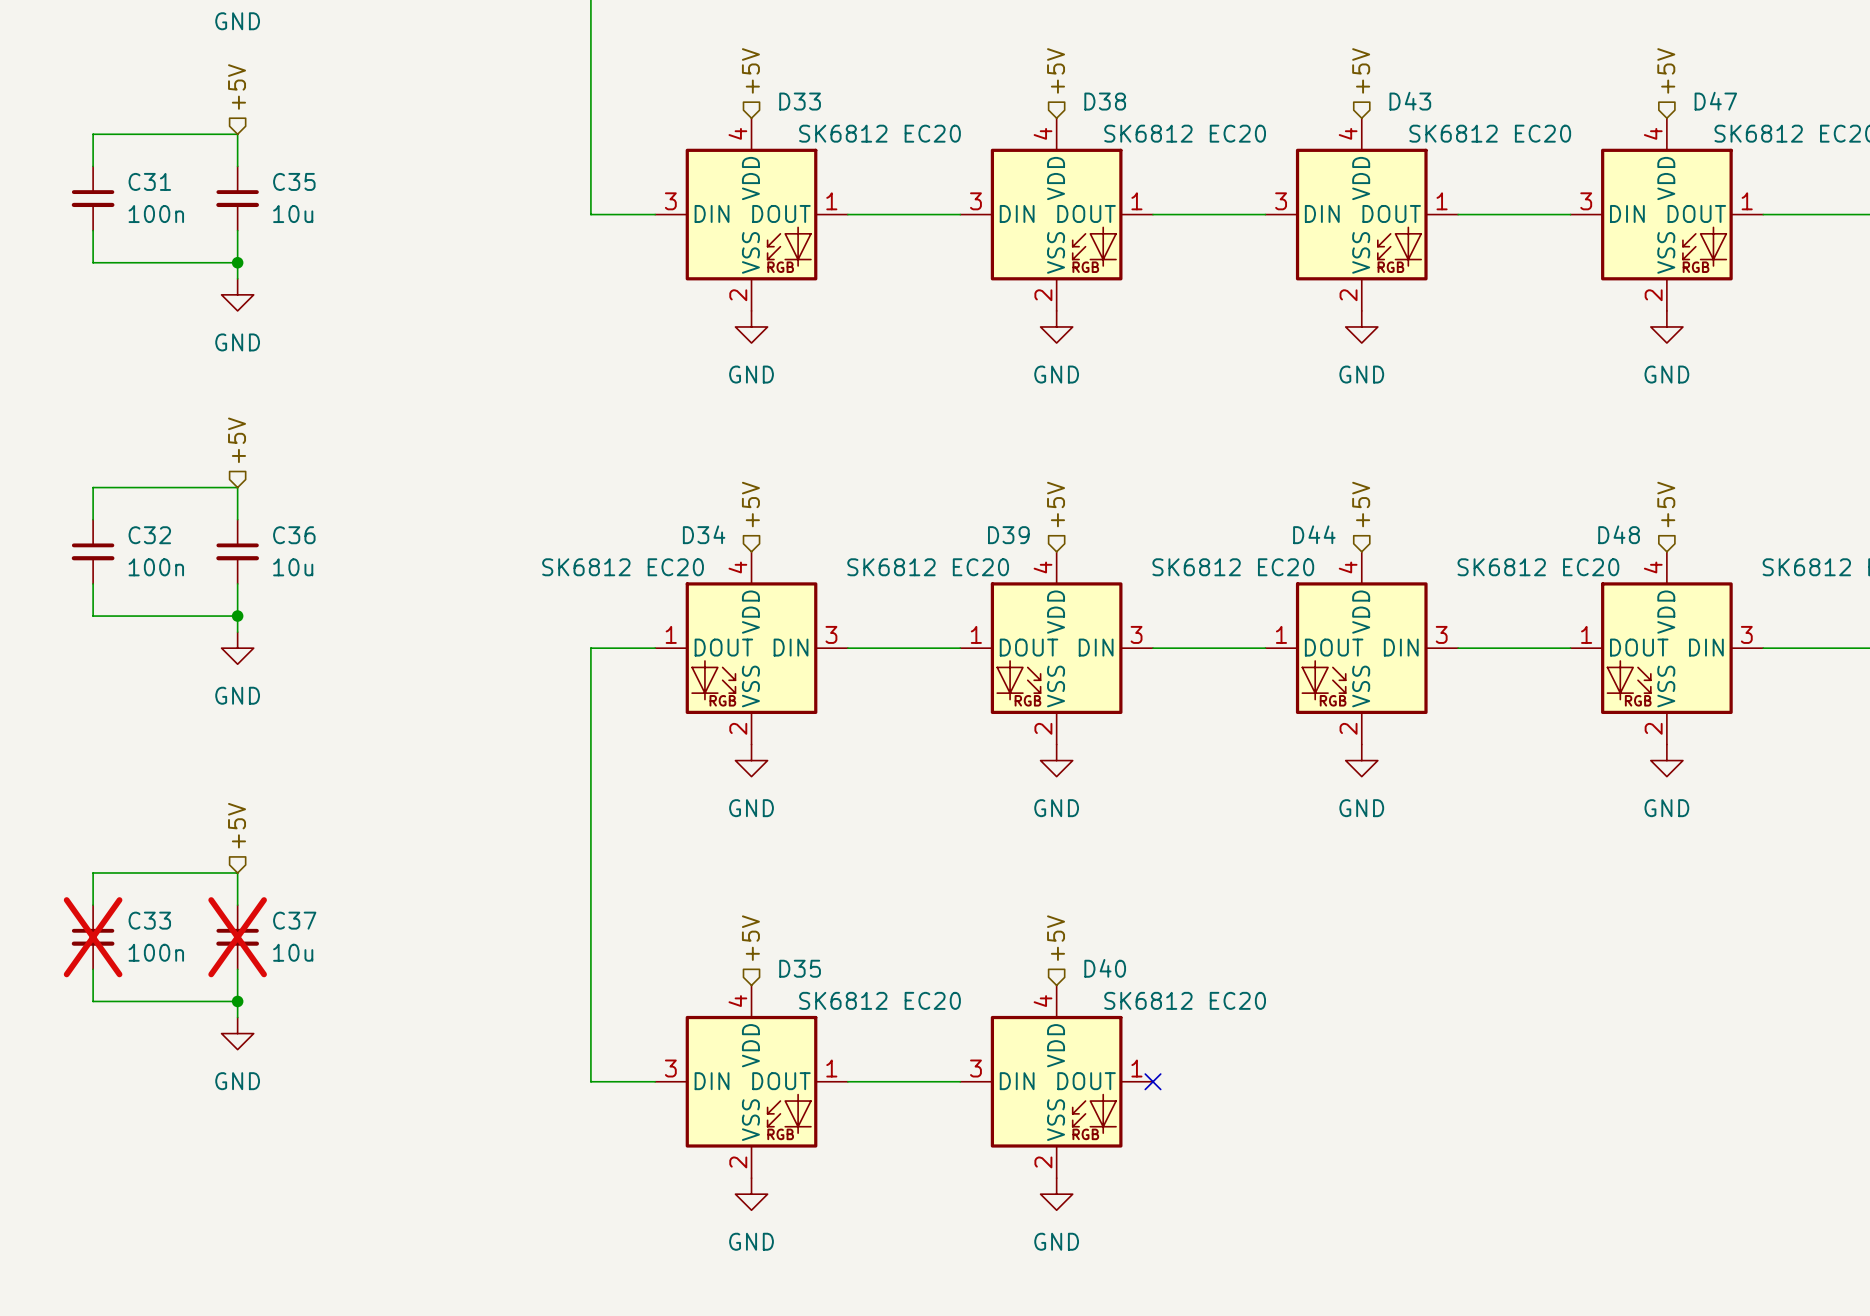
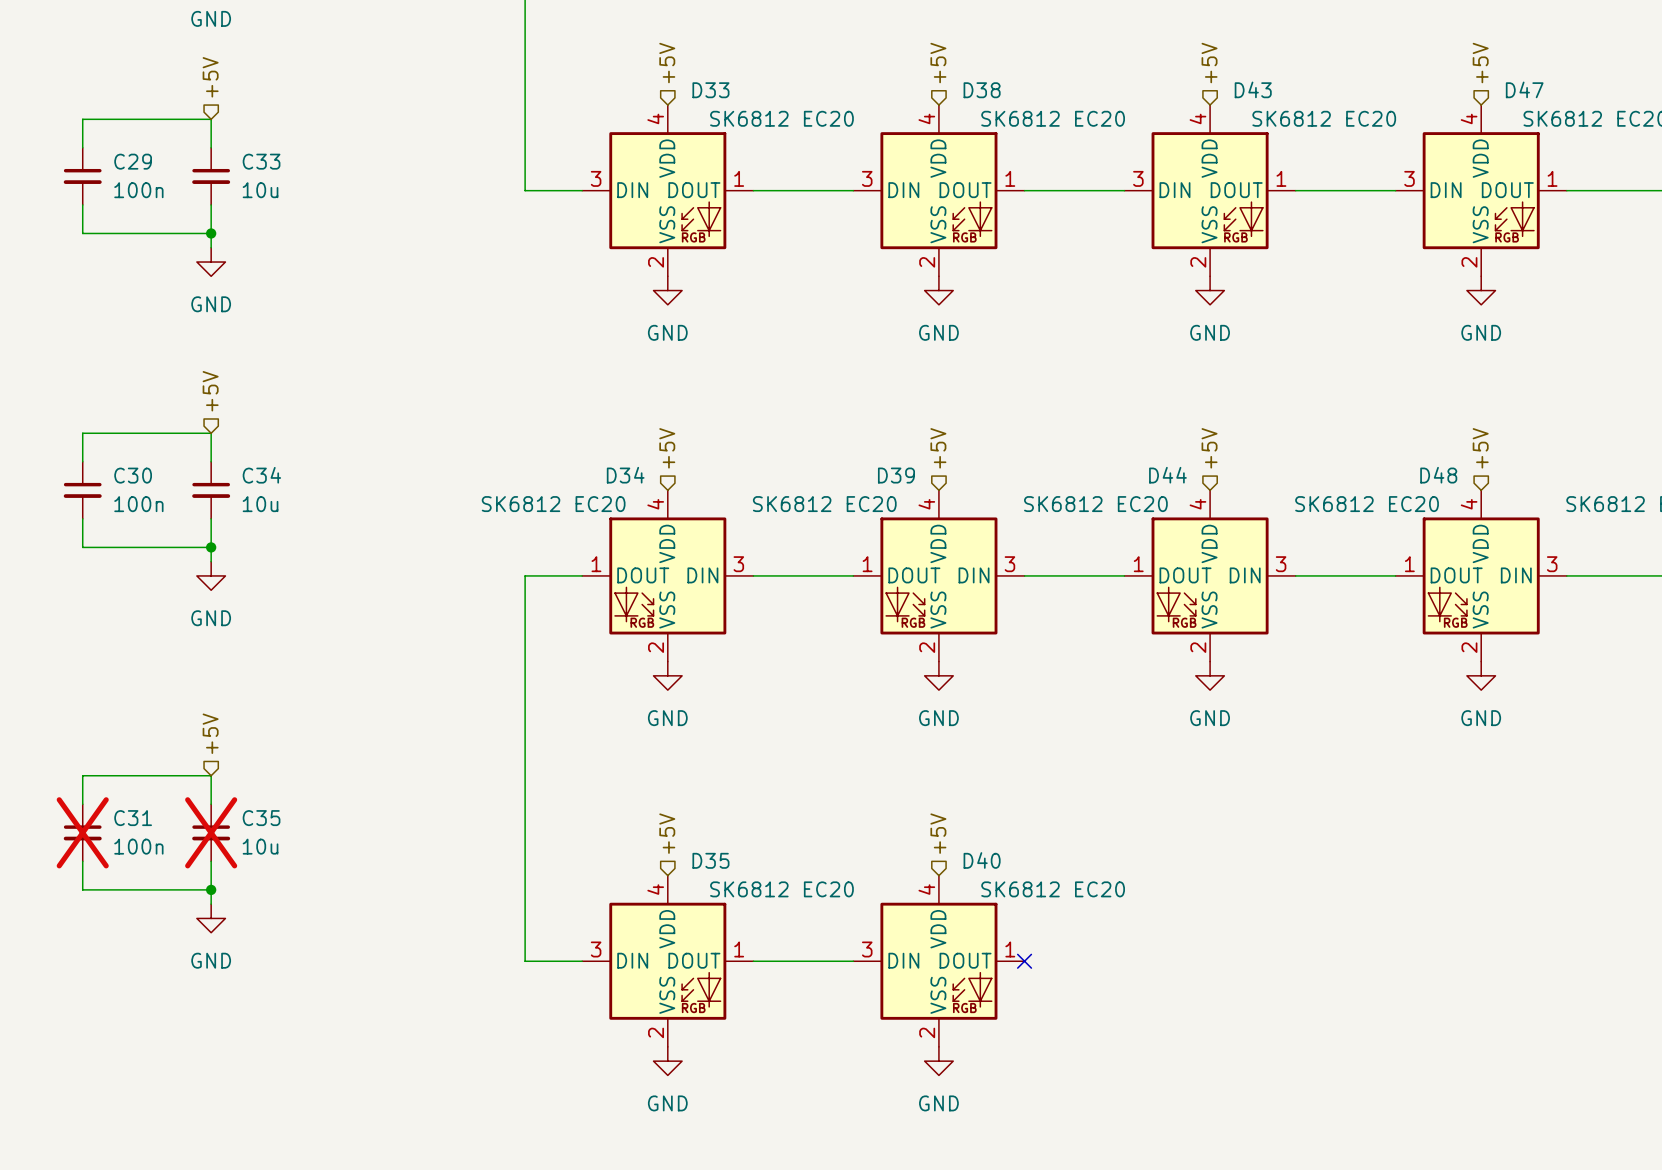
C31 name: C31 (149, 181) -> C29 (133, 161)
C35 name: C35 (294, 181) -> C33 (261, 161)
C32 name: C32 (149, 535) -> C30 (133, 475)
C36 name: C36 (294, 535) -> C34 (261, 475)
C33 name: C33 (149, 920) -> C31 (133, 818)
C37 name: C37 (294, 920) -> C35 (261, 818)

